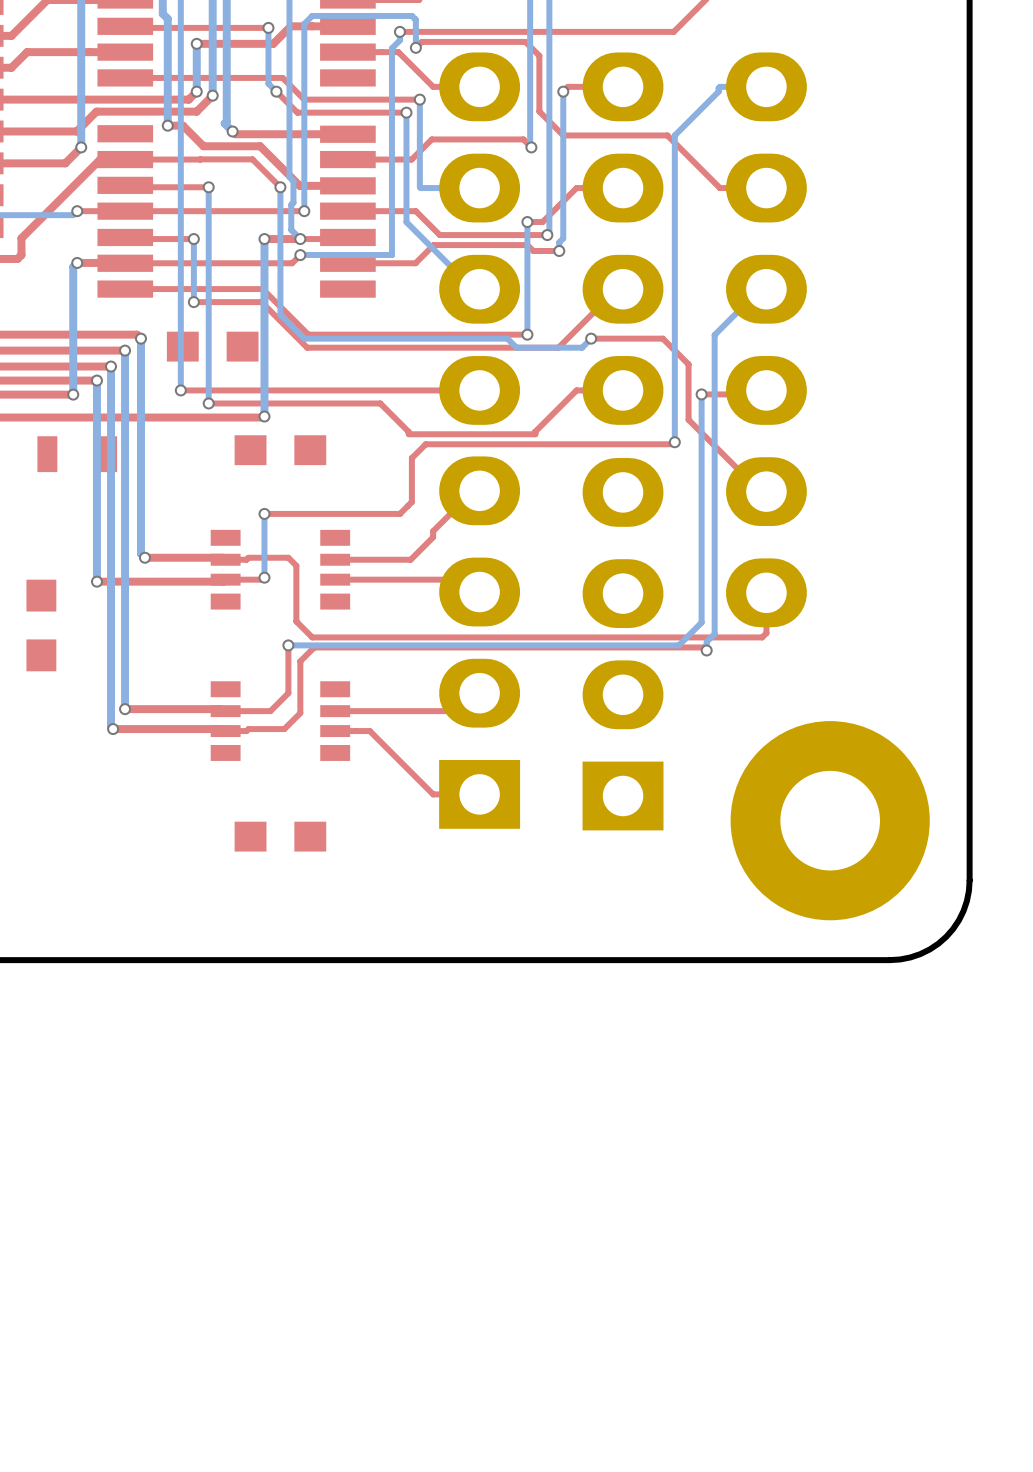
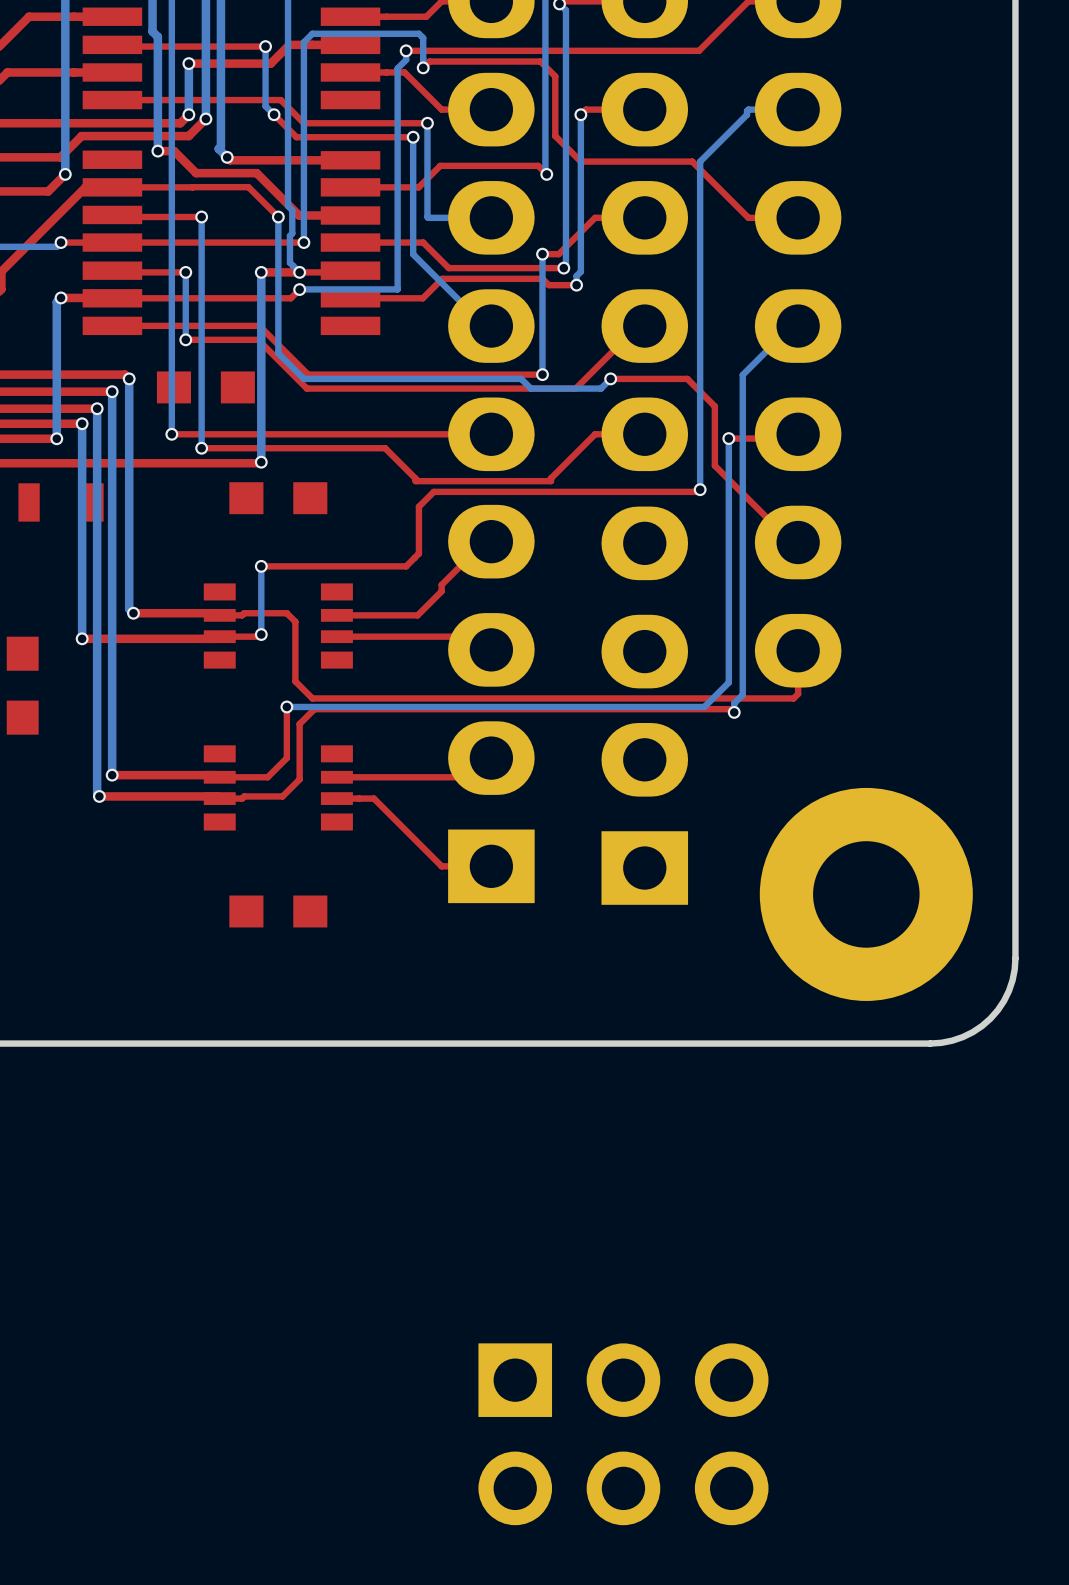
part: none -> (623, 1434)

